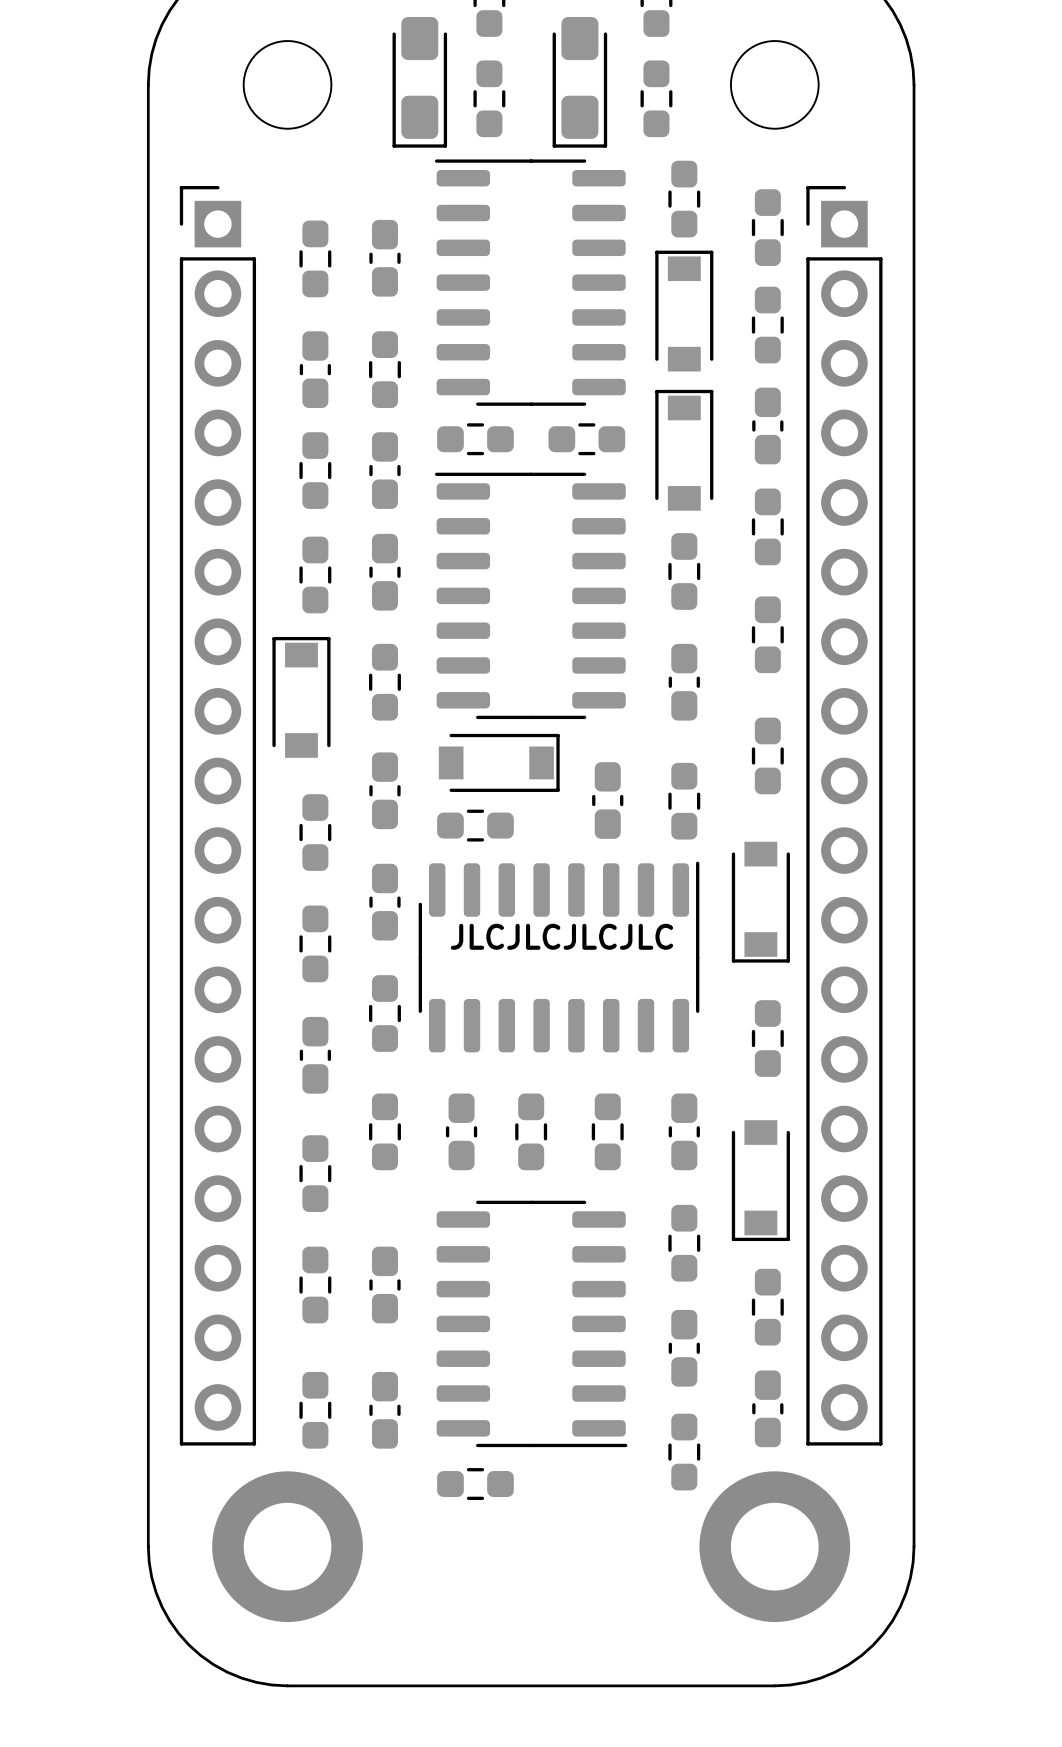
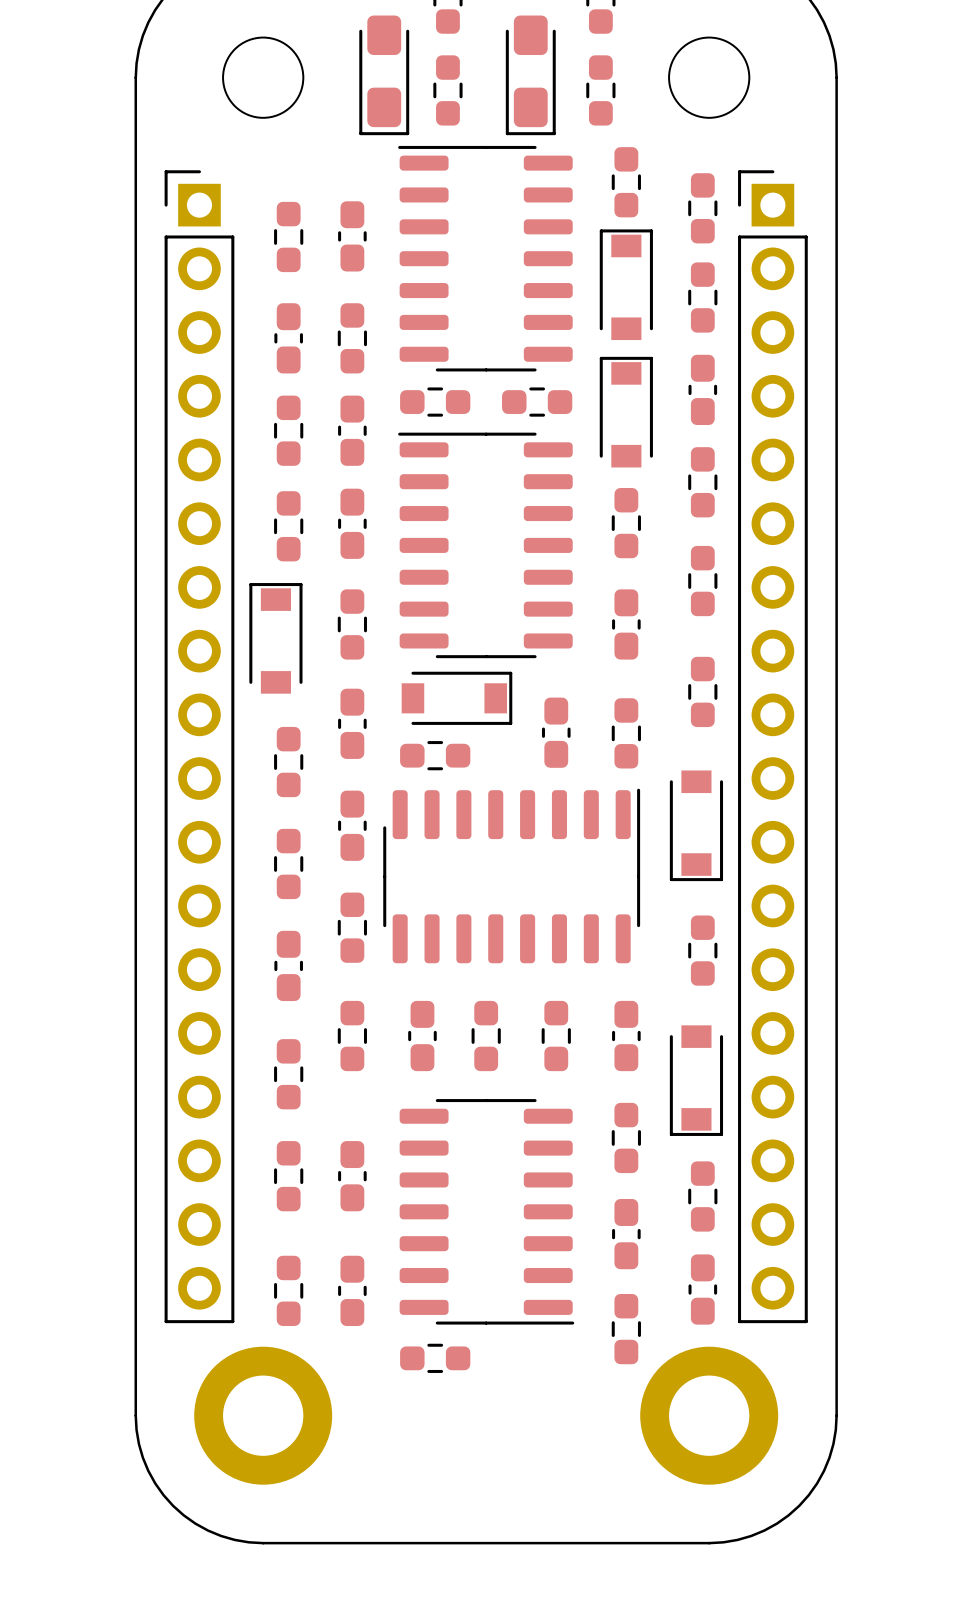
text: JLCJLCJLCJLC (561, 936) -> none

